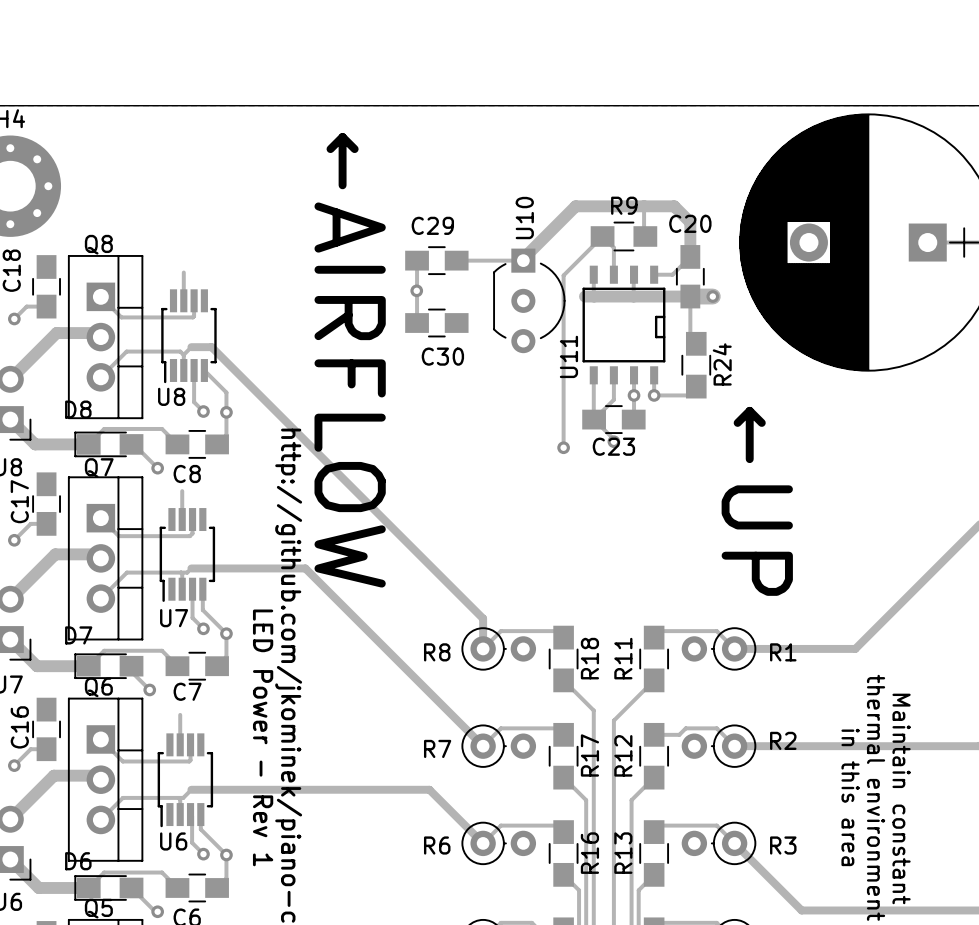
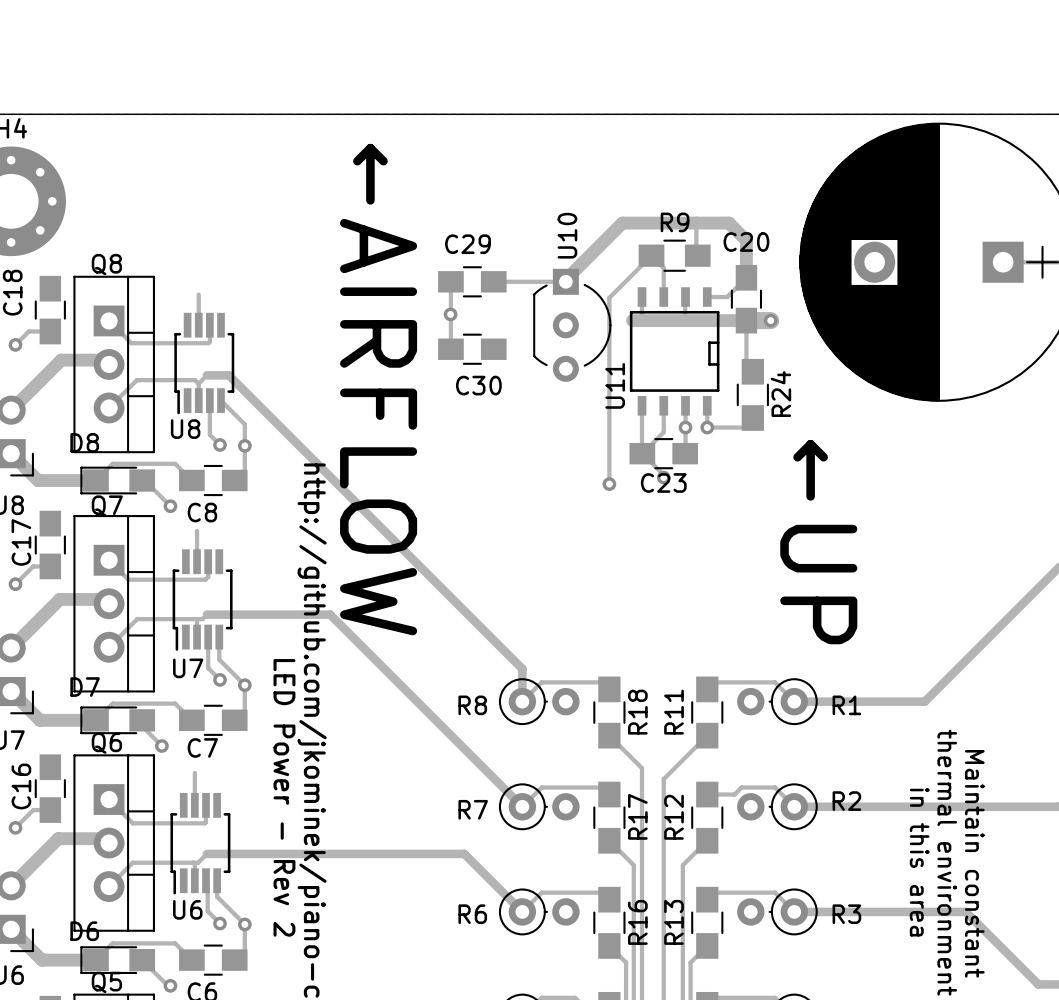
text: LED Power - Rev 1 (263, 737) -> LED Power - Rev 2 (284, 797)
track: (734, 843) (801, 910) (960, 910) -> (794, 911) (965, 911) (1038, 984)

